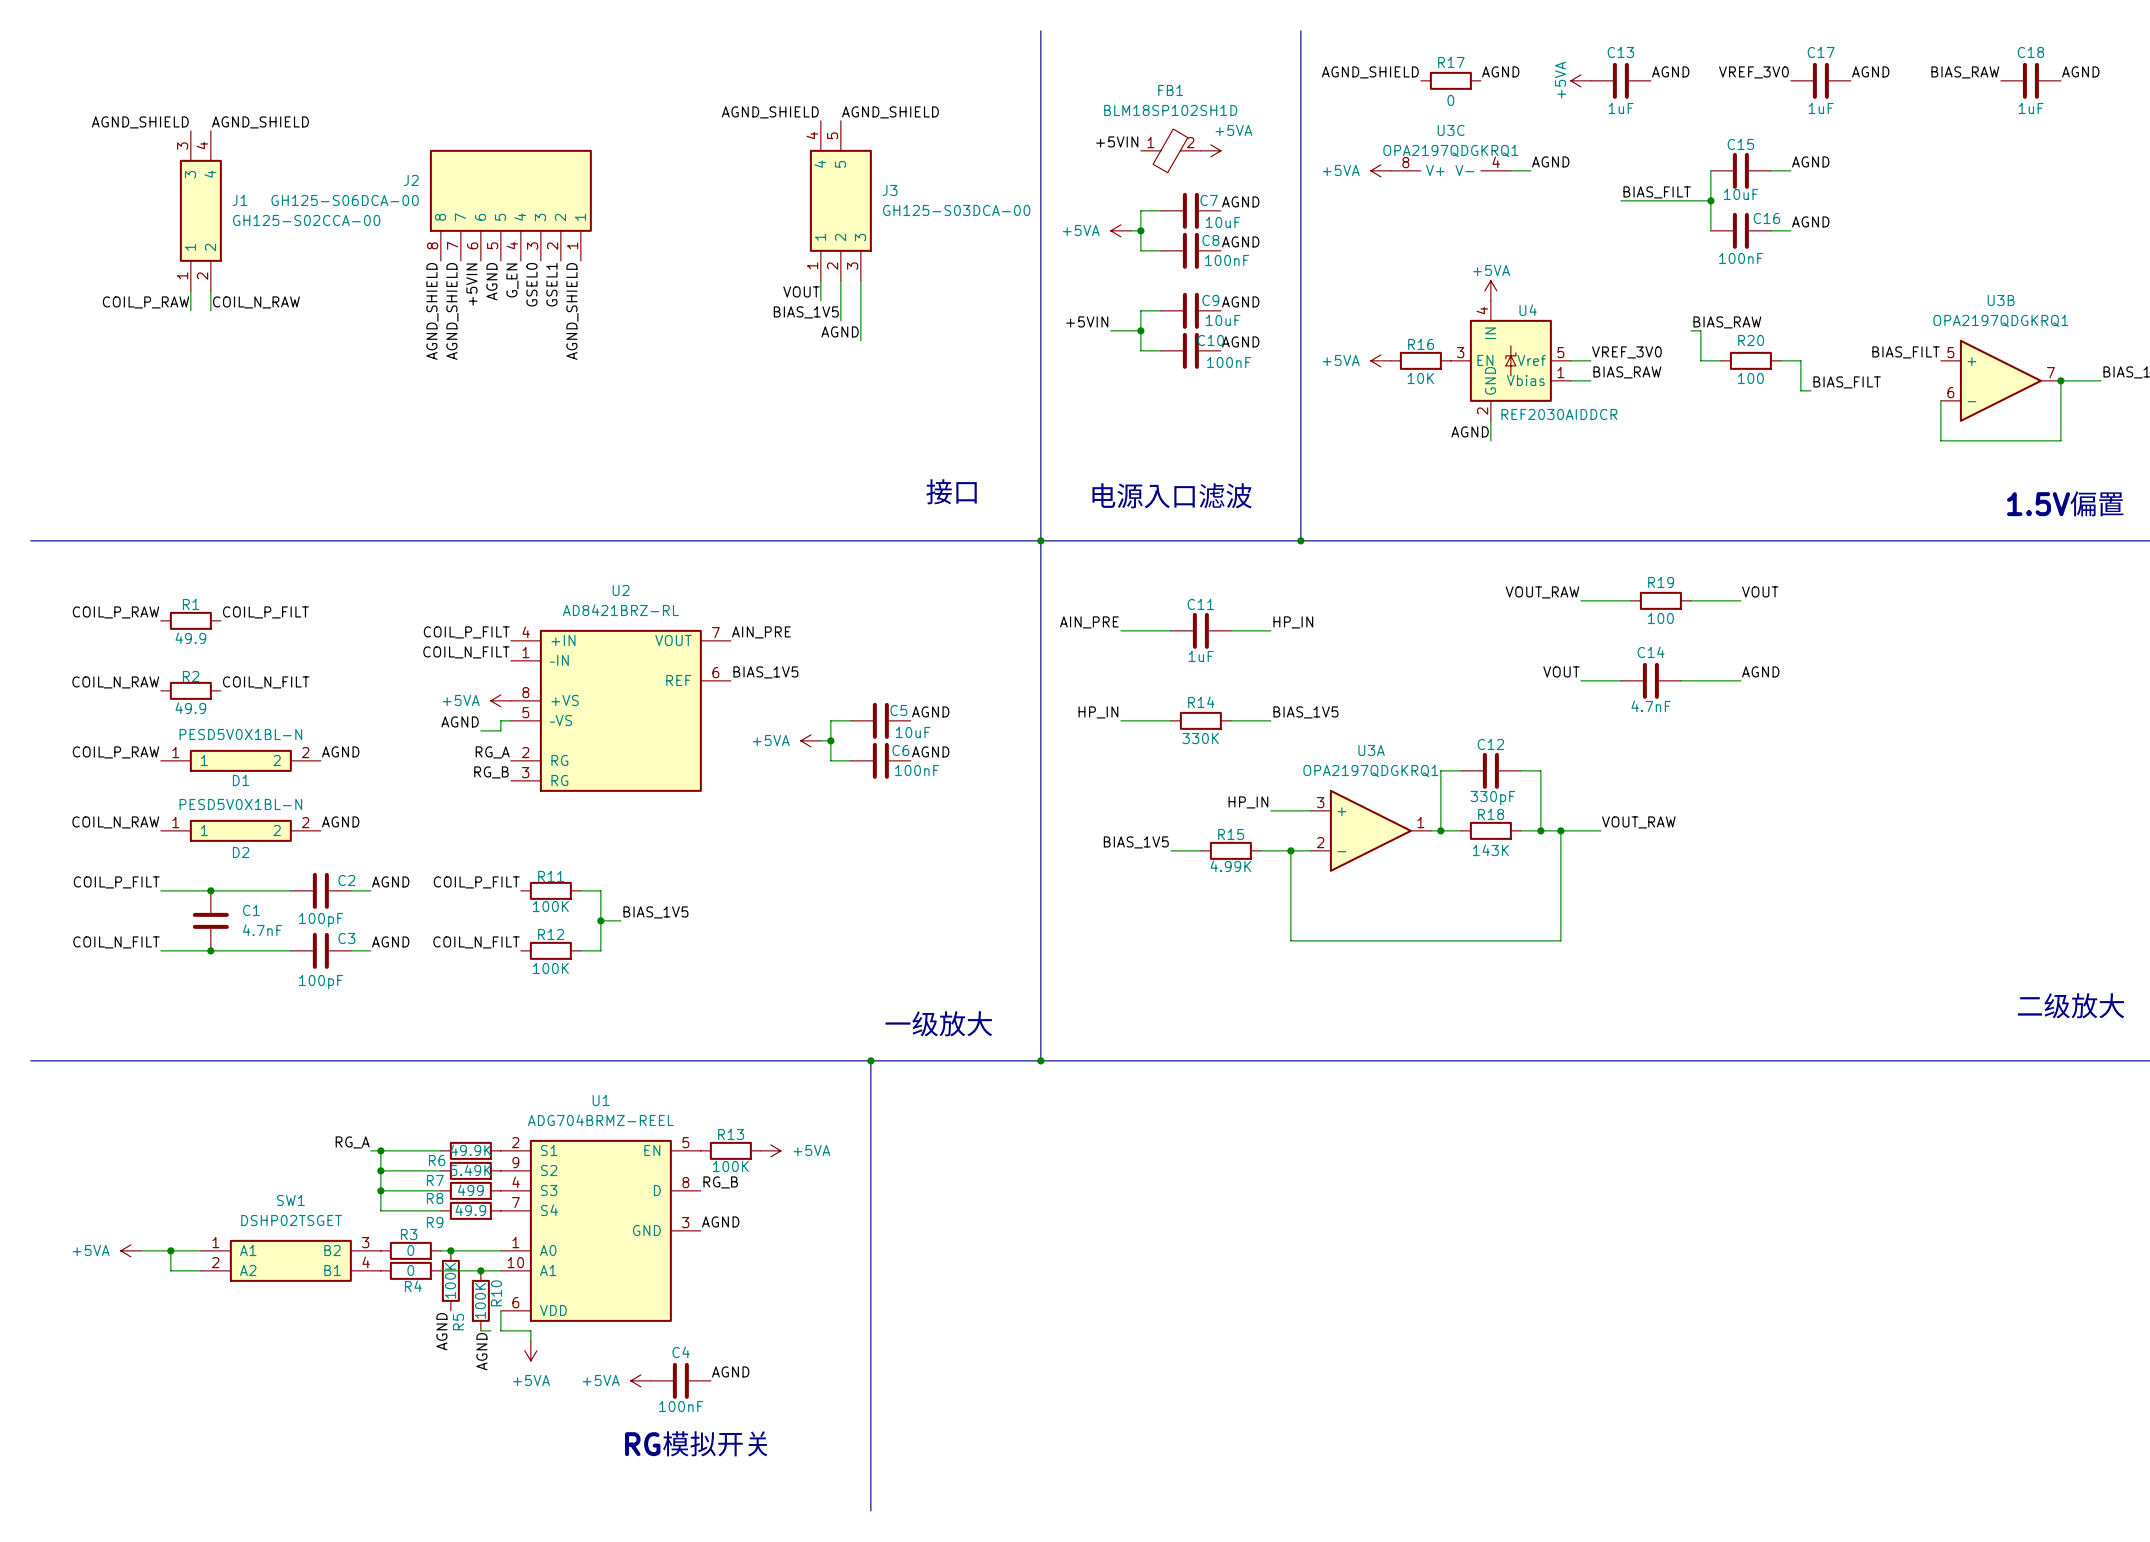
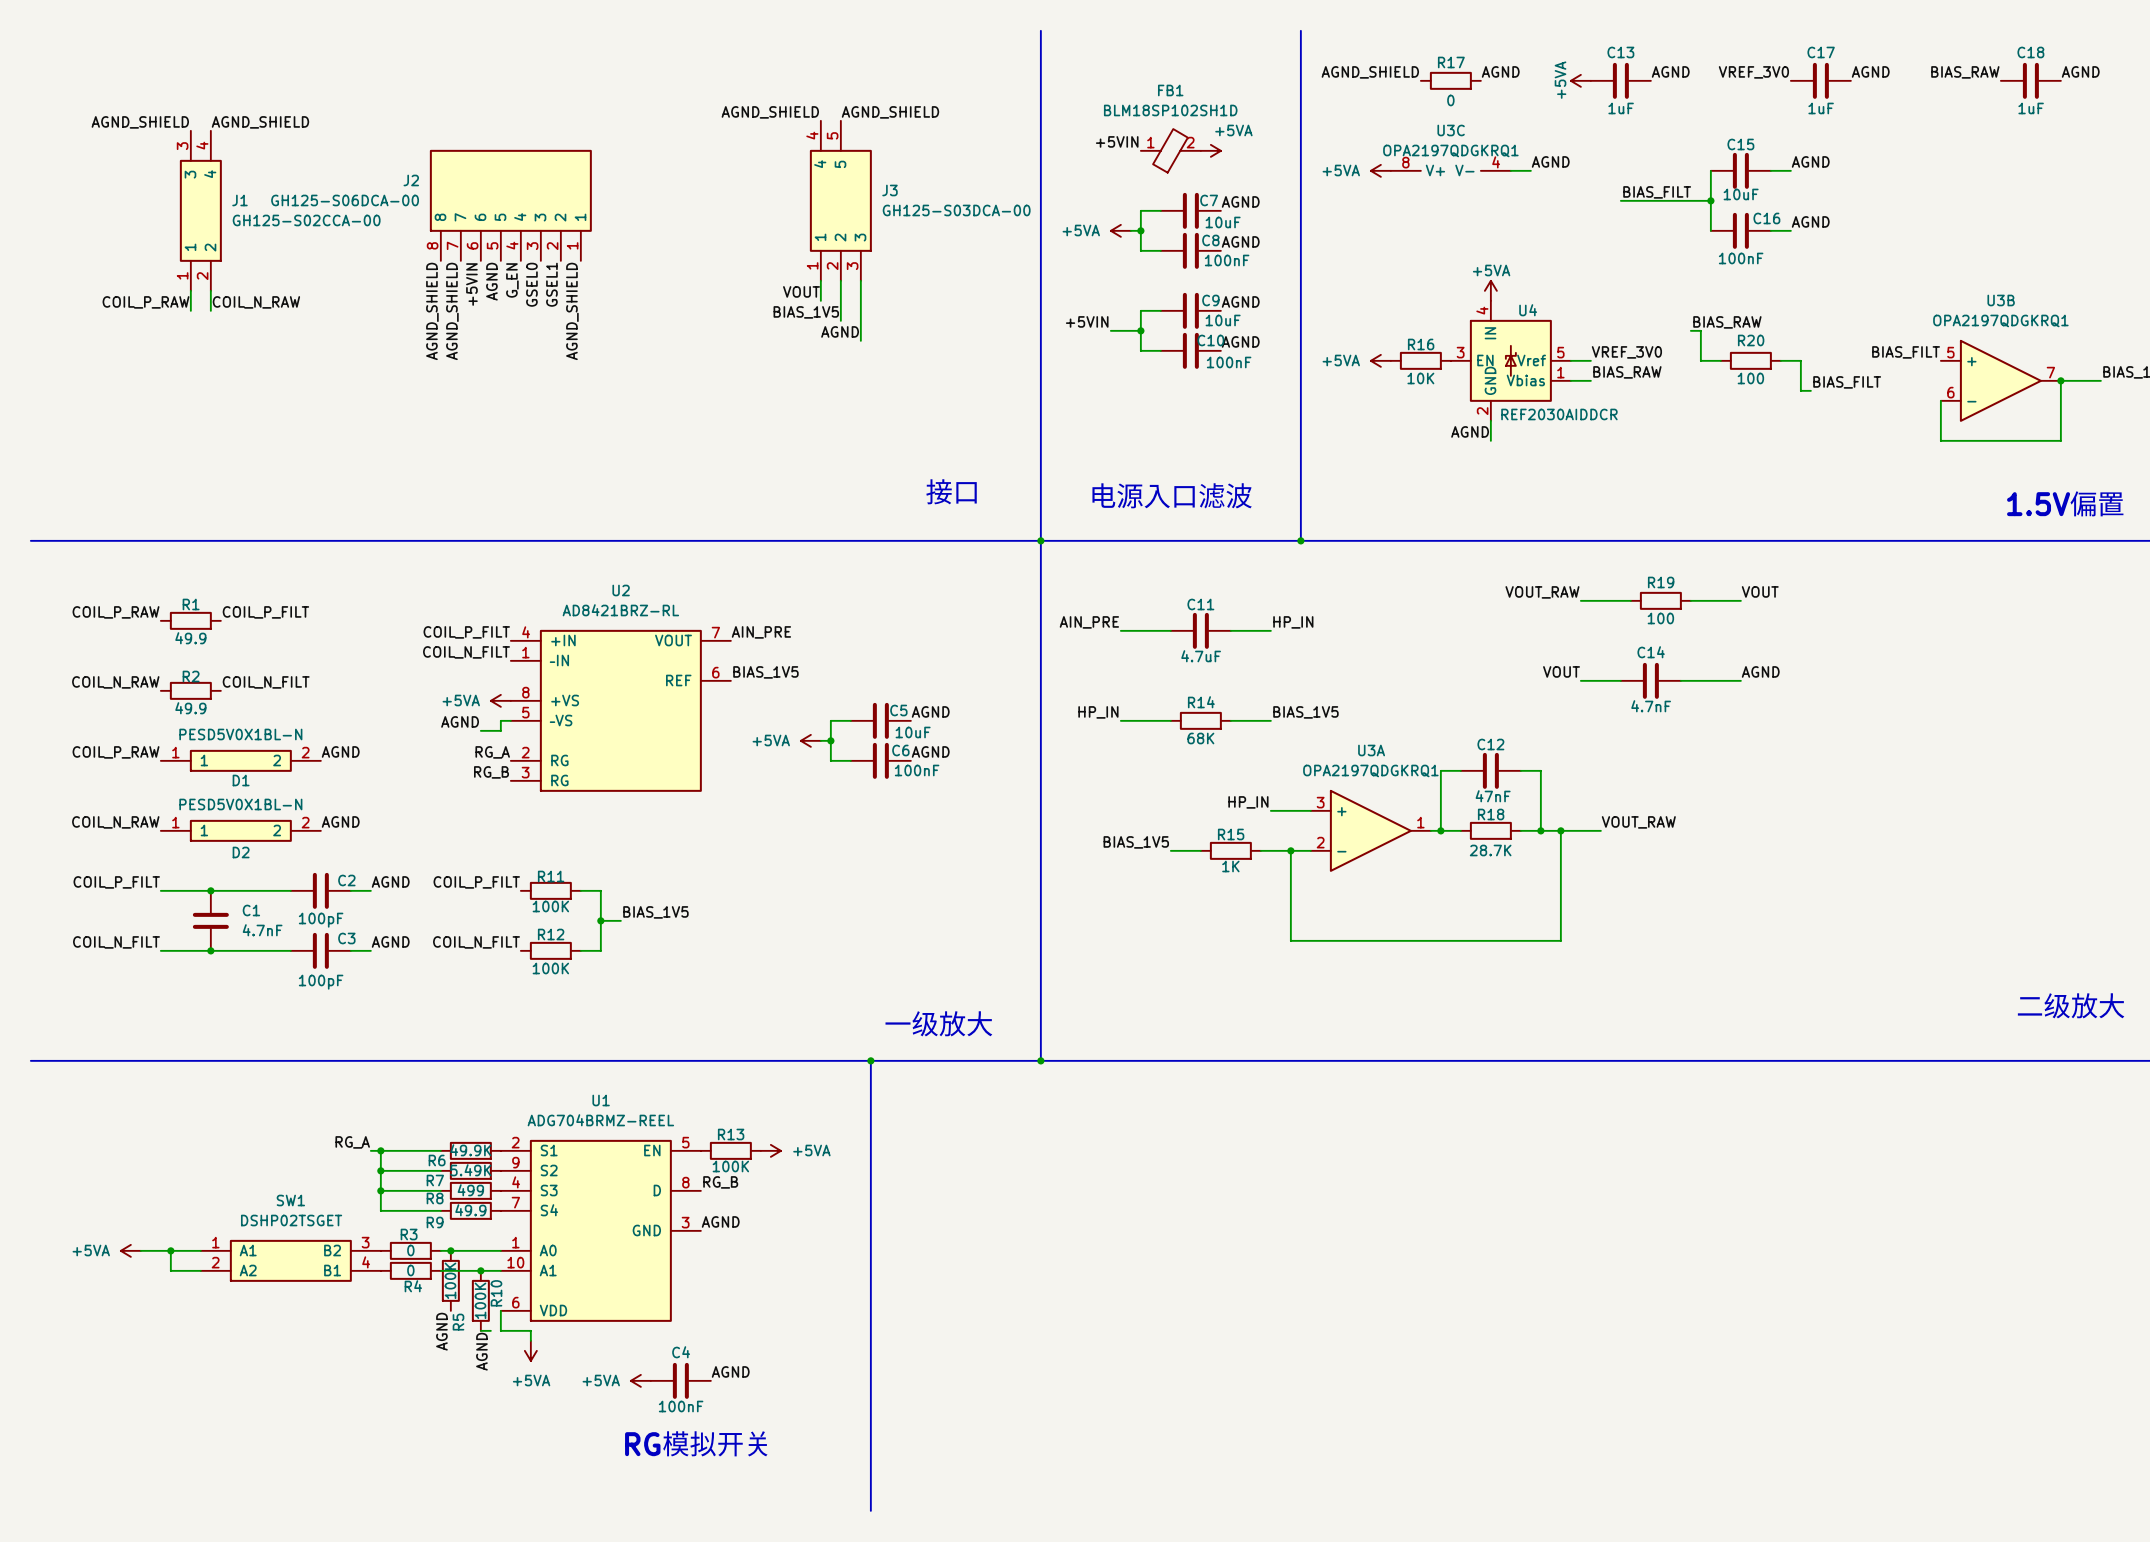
C11 value: 1uF (1201, 656) -> 4.7uF (1201, 656)
R14 value: 330K (1200, 738) -> 68K (1200, 738)
C12 value: 330pF (1492, 798) -> 47nF (1493, 796)
R18 value: 143K (1490, 850) -> 28.7K (1490, 850)
R15 value: 4.99K (1230, 866) -> 1K (1230, 866)

